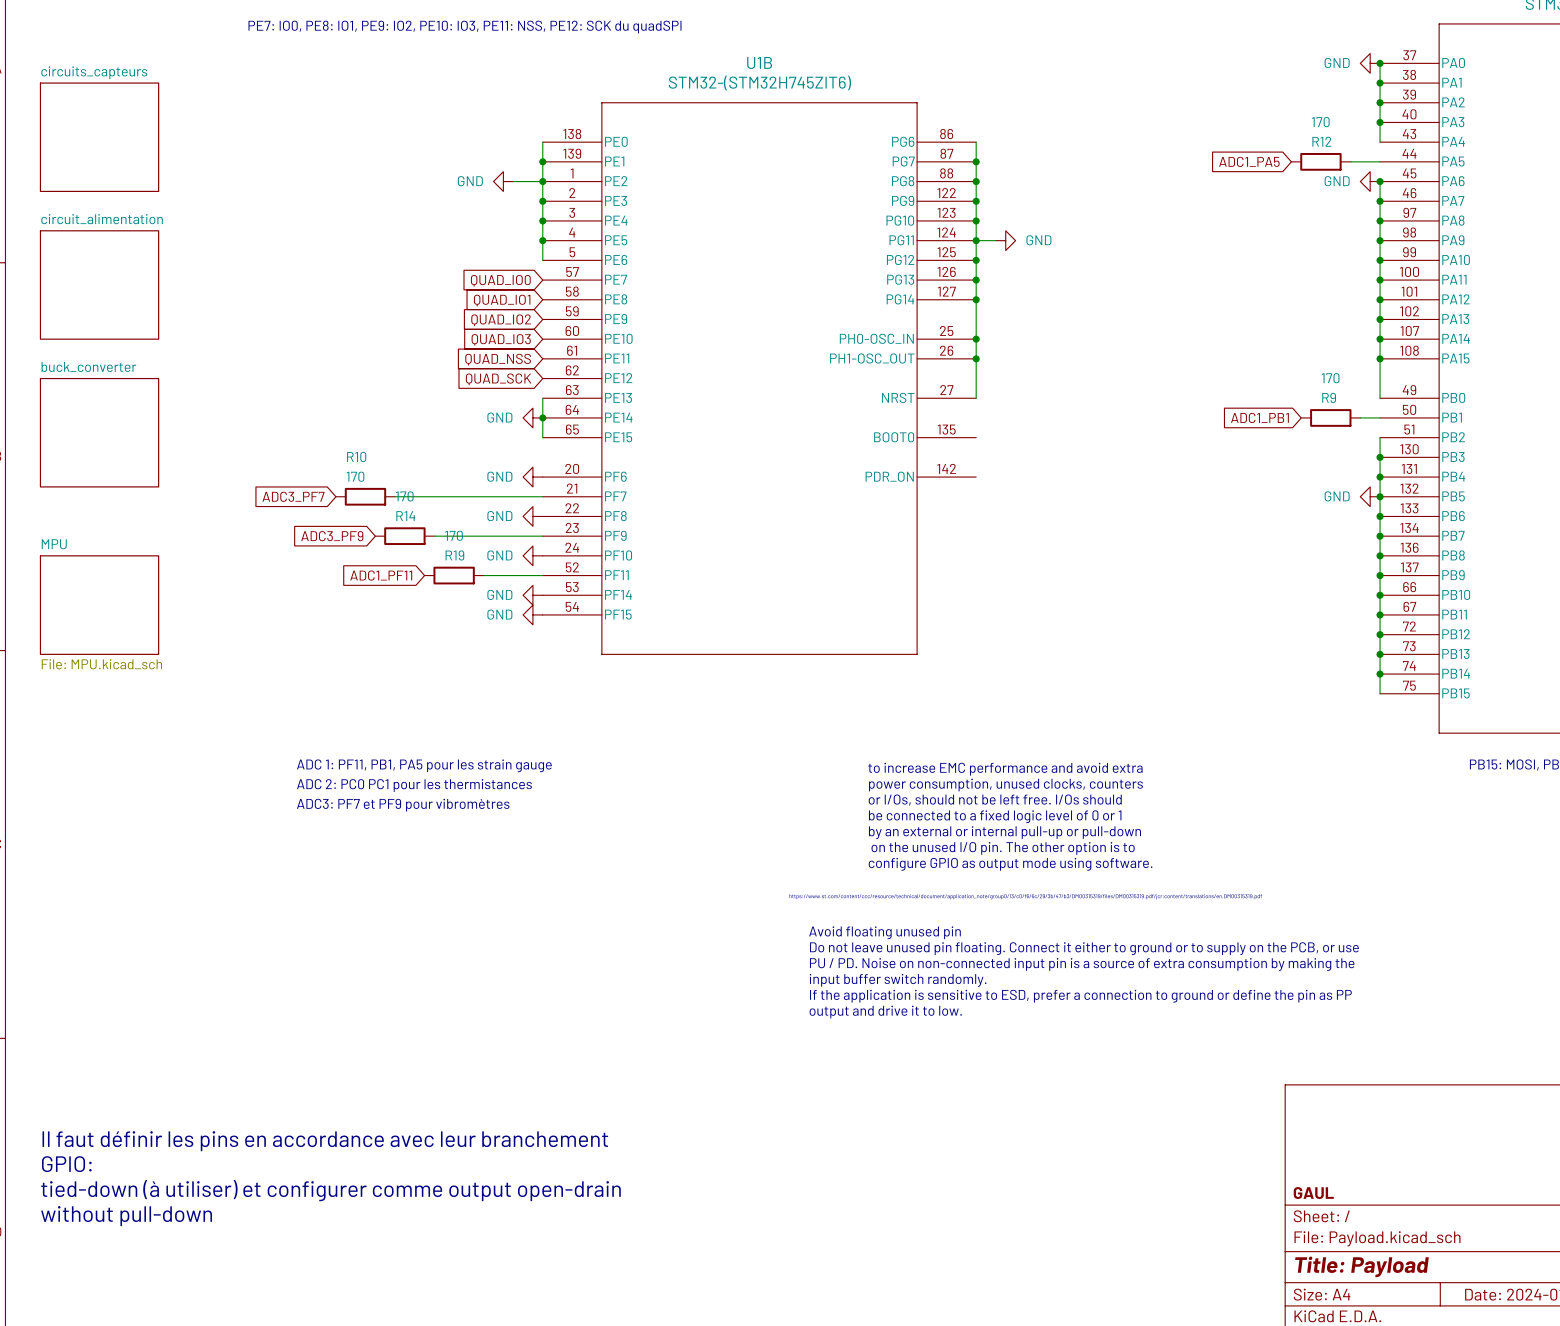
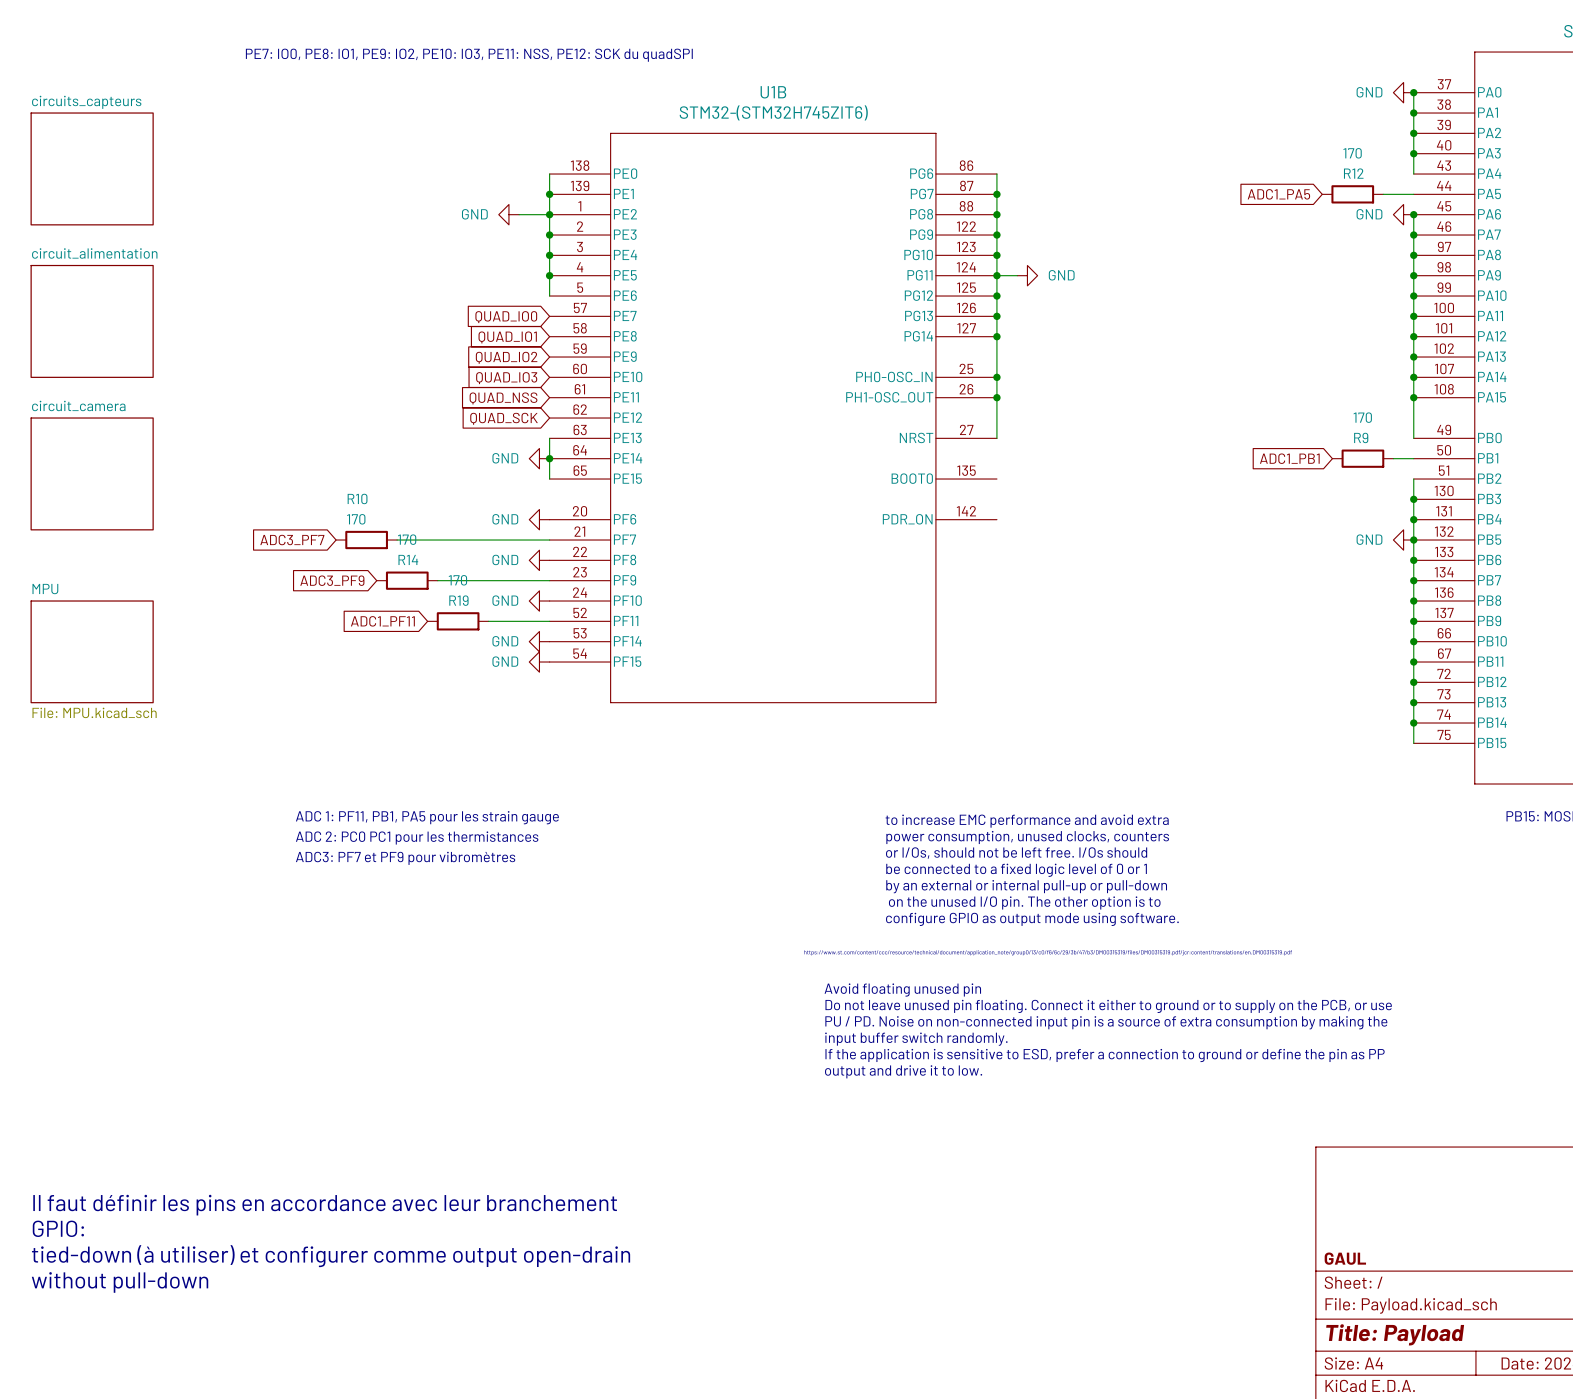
sheet buck_converter name: buck_converter (88, 366) -> circuit_camera (78, 405)

